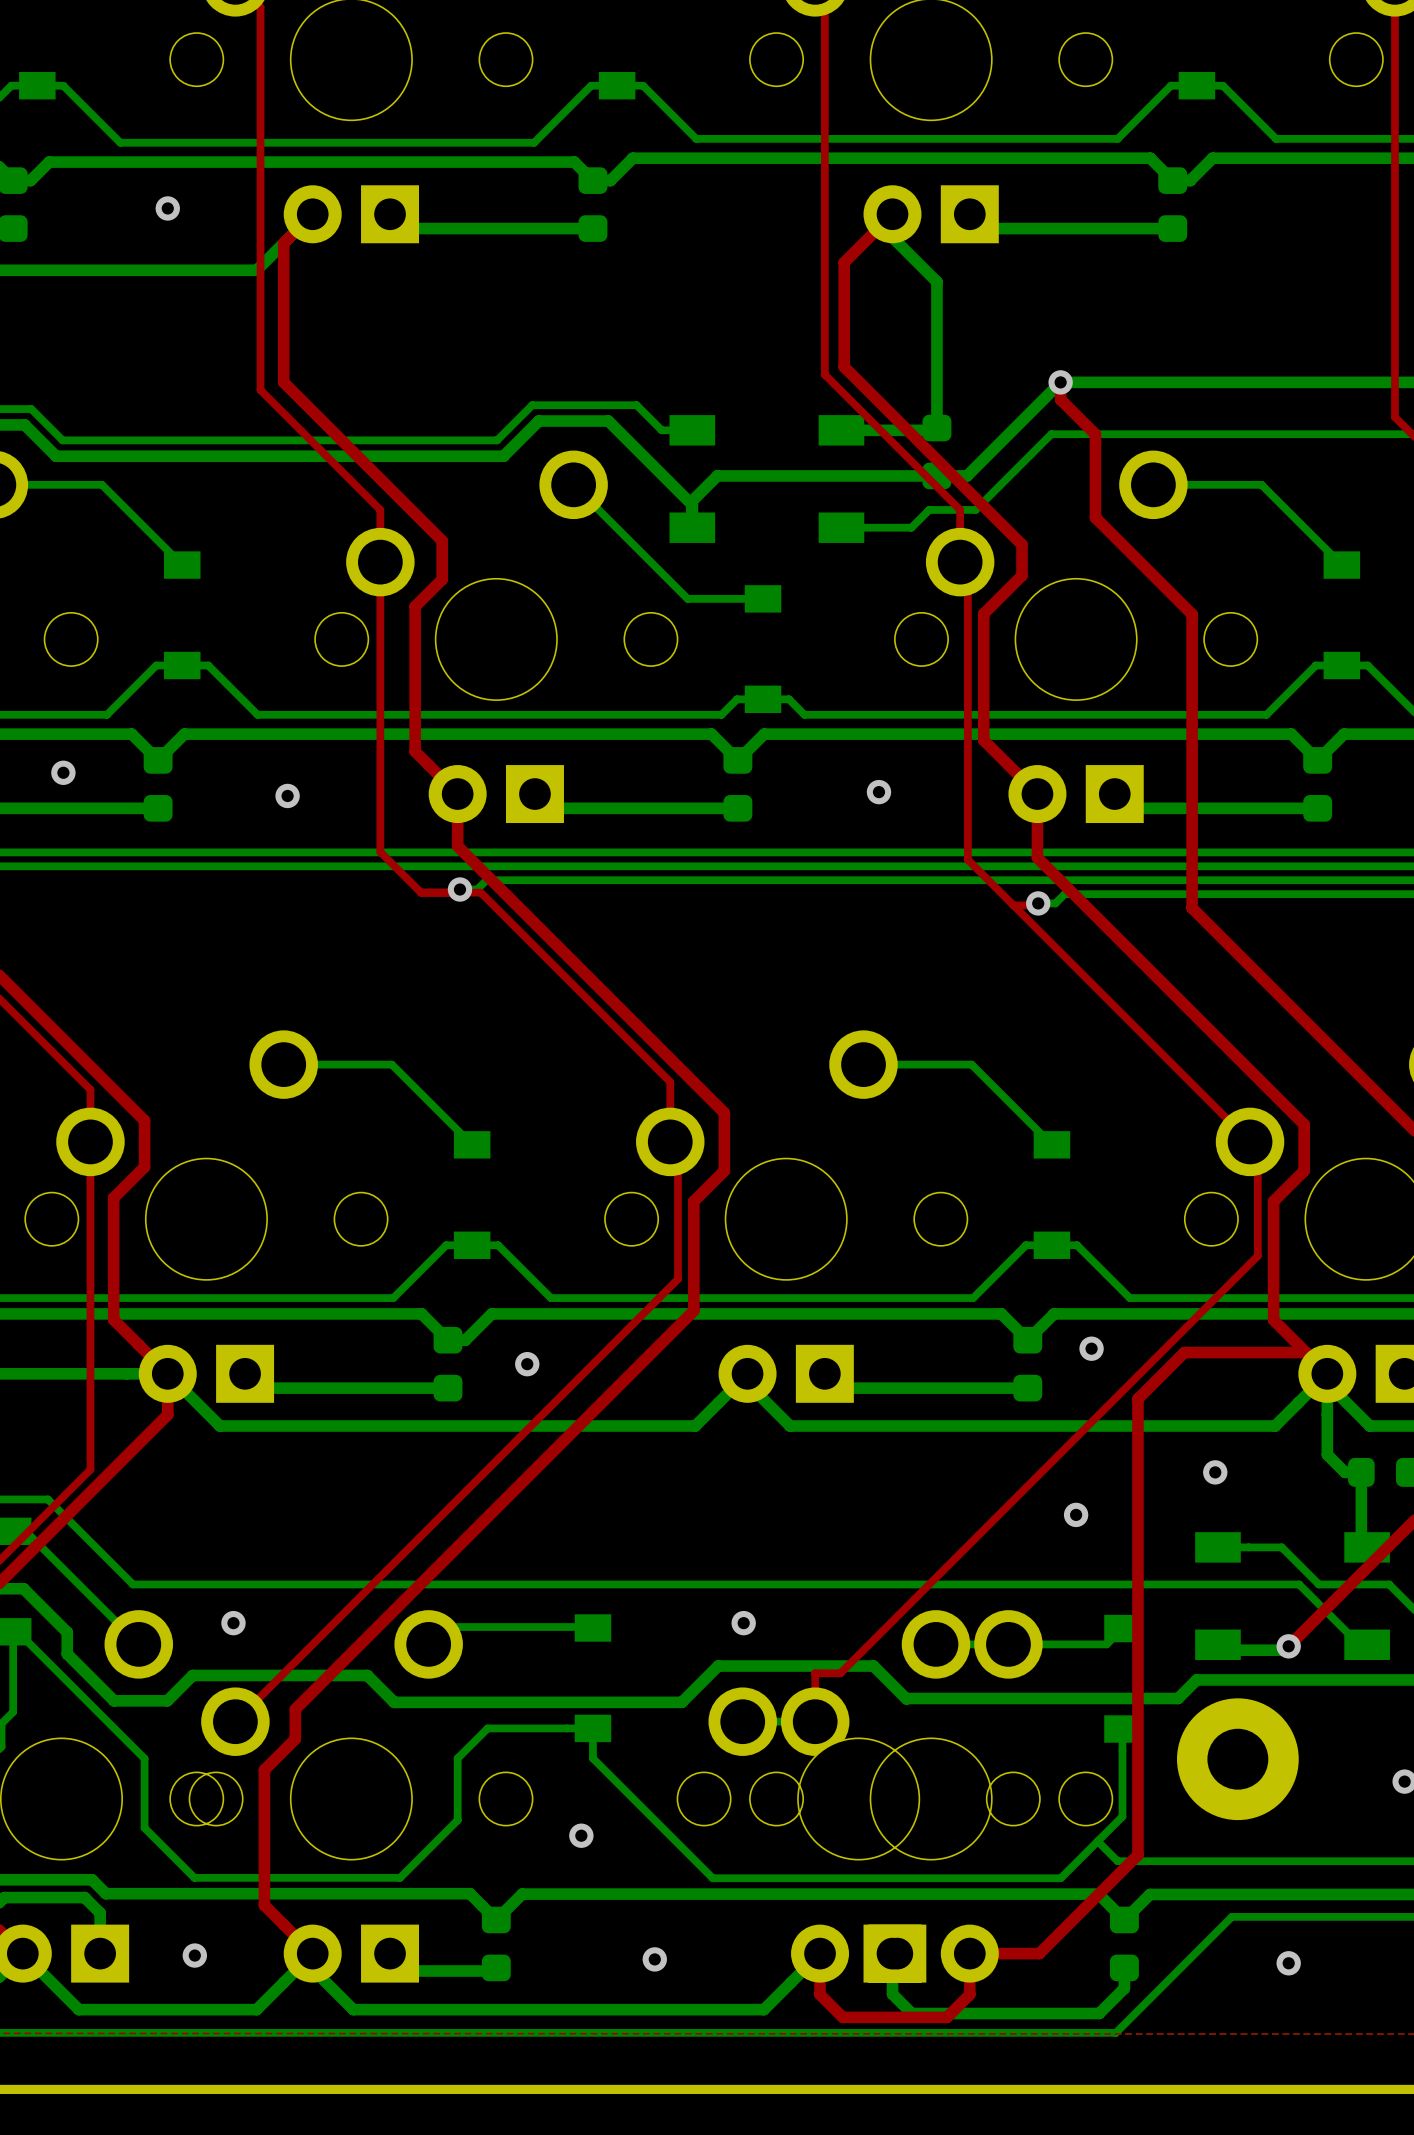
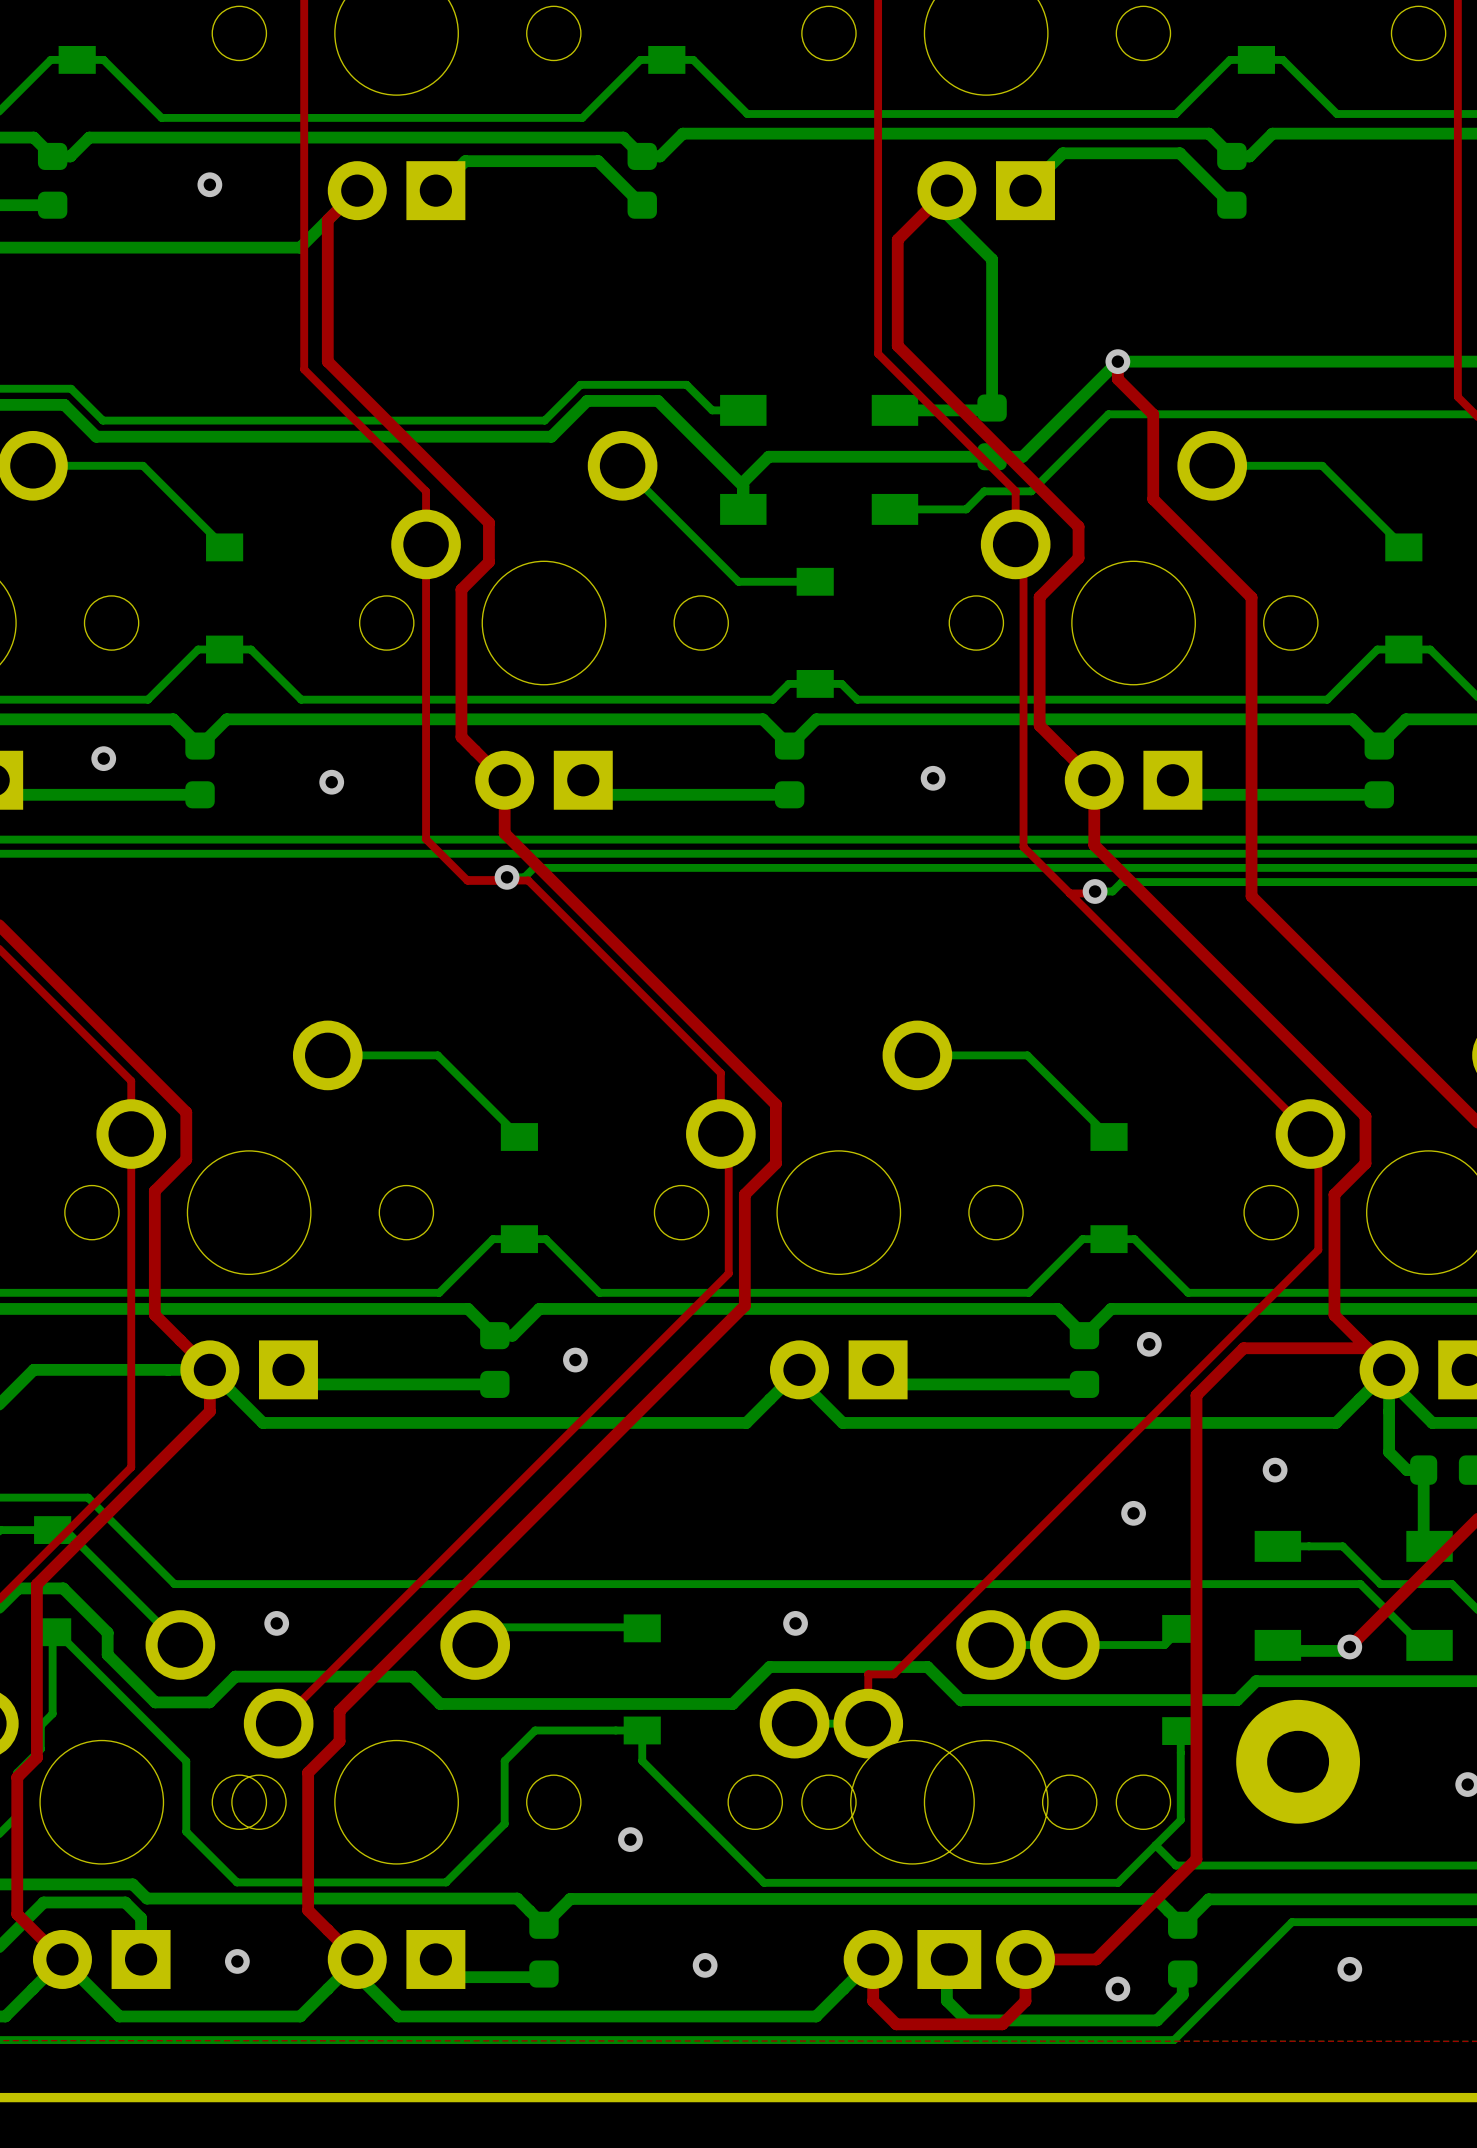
bottom track: (390, 214) (404, 228) (592, 228) -> (435, 190) (465, 161) (598, 161) (642, 205)
bottom track: (969, 214) (984, 228) (1172, 228) -> (1025, 190) (1062, 153) (1179, 153) (1231, 205)
via: none -> (1117, 1988)

